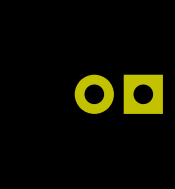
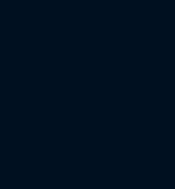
part: (118, 94) -> none

